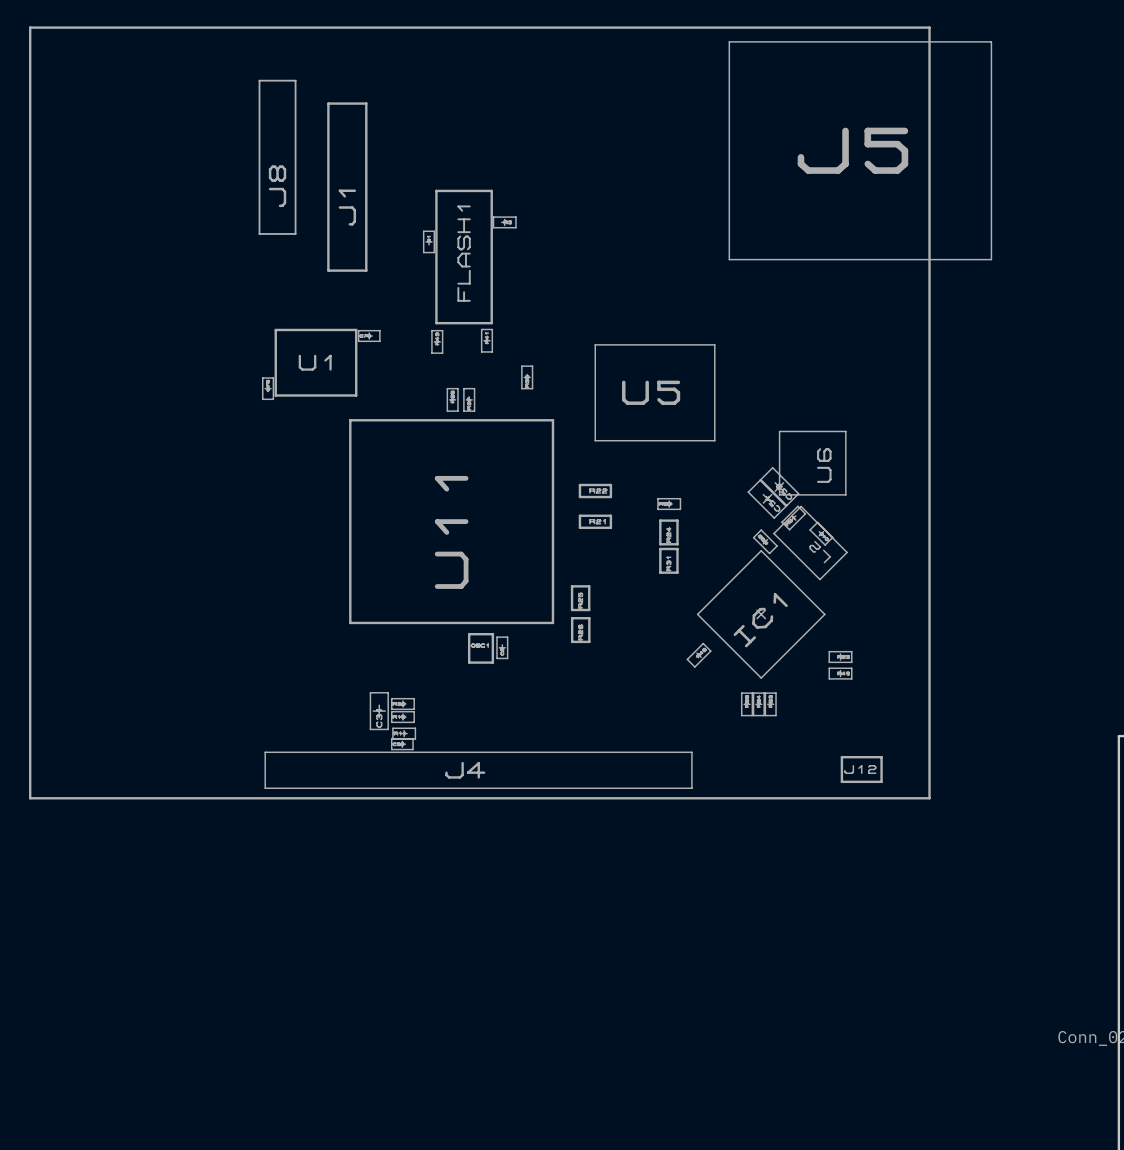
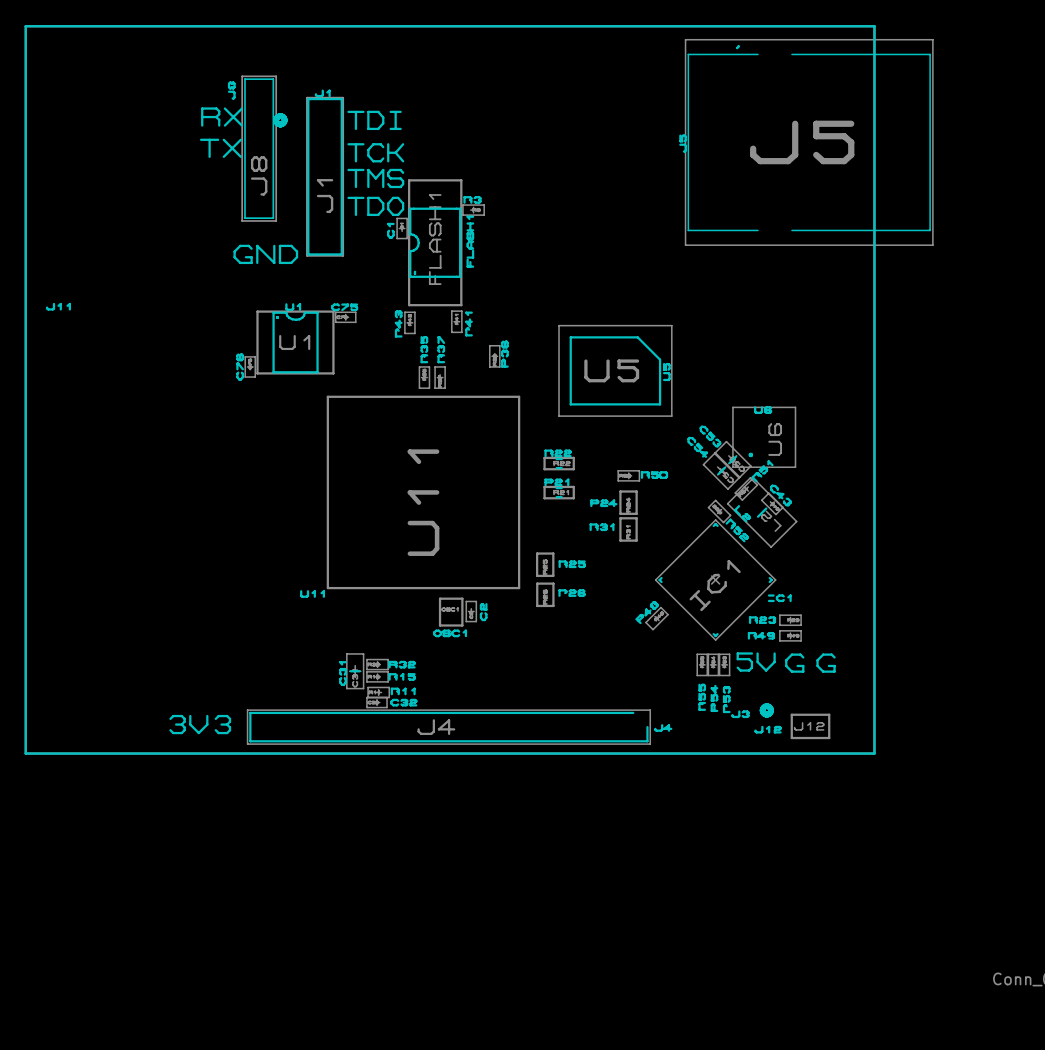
line: none -> (25, 26) (25, 753) (874, 753) (874, 26) (25, 26)
line: none -> (738, 46) (738, 46)
line: none -> (737, 47) (737, 48)
line: none -> (758, 54) (688, 54) (688, 230) (758, 230)
line: none -> (791, 54) (930, 54) (930, 230) (791, 230)
line: none -> (244, 79) (244, 218) (273, 218) (273, 79) (244, 79)
line: none -> (229, 82) (229, 87) (233, 88) (234, 83) (229, 82)
line: none -> (322, 90) (321, 96) (315, 94)
line: none -> (229, 91) (234, 92) (232, 98)
line: none -> (327, 92) (329, 90) (329, 96)
line: none -> (308, 99) (308, 254) (341, 254) (341, 99) (308, 99)
line: none -> (224, 108) (241, 125)
line: none -> (241, 108) (224, 125)
line: none -> (348, 111) (363, 111)
line: none -> (355, 111) (355, 128)
line: none -> (368, 111) (378, 111) (383, 117) (383, 123) (378, 128) (368, 128) (368, 111)
line: none -> (390, 111) (400, 111)
line: none -> (395, 111) (395, 128)
line: none -> (280, 116) (276, 120) (280, 124) (284, 120) (280, 116)
line: none -> (202, 117) (216, 117)
line: none -> (216, 117) (219, 119) (219, 125)
line: none -> (216, 117) (219, 114) (216, 108) (202, 108) (202, 125)
line: none -> (390, 128) (400, 128)
line: none -> (680, 135) (680, 141) (682, 141) (683, 135) (685, 136) (684, 141)
line: none -> (201, 139) (218, 139)
line: none -> (209, 139) (209, 156)
line: none -> (223, 139) (240, 156)
line: none -> (240, 139) (223, 156)
line: none -> (348, 144) (363, 144)
line: none -> (355, 144) (355, 161)
line: none -> (388, 144) (388, 161)
line: none -> (403, 144) (395, 152)
line: none -> (680, 144) (685, 145) (683, 151)
line: none -> (383, 147) (380, 144) (373, 144) (368, 149) (368, 155) (373, 161) (380, 161) (383, 158)
line: none -> (388, 152) (395, 152)
line: none -> (395, 152) (403, 161)
line: none -> (348, 169) (363, 169)
line: none -> (355, 169) (355, 186)
line: none -> (403, 172) (400, 169) (390, 169) (388, 175) (390, 178) (400, 178) (403, 184) (400, 186) (390, 186) (388, 184)
line: none -> (368, 186) (368, 169) (375, 178) (383, 169) (383, 186)
line: none -> (348, 197) (363, 197)
line: none -> (355, 197) (355, 214)
line: none -> (368, 197) (378, 197) (383, 203) (383, 209) (378, 214) (368, 214) (368, 197)
line: none -> (393, 197) (398, 197) (403, 203) (403, 209) (398, 214) (393, 214) (388, 209) (388, 203) (393, 197)
line: none -> (474, 198) (480, 198) (479, 202) (474, 201)
line: none -> (464, 202) (464, 197) (471, 198) (471, 202)
line: none -> (410, 208) (460, 208) (460, 276) (410, 276) (410, 251) (416, 248) (418, 242) (416, 236) (410, 234) (410, 208)
line: none -> (473, 216) (467, 216) (469, 218)
line: none -> (467, 223) (473, 223)
line: none -> (470, 223) (470, 230)
line: none -> (393, 223) (388, 223) (389, 226)
line: none -> (467, 230) (473, 230)
line: none -> (389, 230) (389, 237) (393, 235) (392, 230)
line: none -> (468, 232) (467, 238) (469, 239) (472, 232) (472, 239)
line: none -> (471, 241) (471, 248)
line: none -> (473, 241) (467, 243) (469, 248) (473, 248)
line: none -> (274, 245) (274, 262) (257, 245) (257, 262)
line: none -> (279, 245) (291, 245) (297, 251) (297, 257) (291, 262) (279, 262) (279, 245)
line: none -> (251, 248) (248, 245) (240, 245) (234, 251) (234, 257) (240, 262) (251, 262) (251, 257) (245, 257)
line: none -> (473, 250) (473, 257) (467, 257)
line: none -> (467, 259) (467, 266) (473, 266)
line: none -> (470, 262) (470, 266)
line: none -> (415, 271) (414, 272)
line: none -> (414, 273) (415, 273)
line: none -> (53, 303) (52, 309) (47, 307)
line: none -> (286, 304) (287, 309) (293, 308) (293, 304)
line: none -> (342, 304) (347, 304) (342, 310)
line: none -> (357, 304) (351, 304) (351, 306) (357, 307) (355, 310) (351, 309)
line: none -> (58, 305) (60, 303) (60, 309)
line: none -> (67, 305) (69, 303) (69, 309)
line: none -> (338, 305) (332, 306) (334, 310) (338, 309)
line: none -> (297, 306) (300, 304) (300, 309)
line: none -> (273, 312) (273, 372) (317, 372) (317, 312) (304, 312) (302, 317) (296, 319) (289, 317) (286, 312) (273, 312)
line: none -> (398, 312) (395, 312) (396, 317)
line: none -> (398, 312) (401, 312) (400, 317)
line: none -> (398, 312) (398, 314)
line: none -> (471, 312) (466, 312) (468, 314)
line: none -> (469, 319) (469, 326) (466, 321) (471, 321)
line: none -> (399, 320) (399, 327) (395, 322) (401, 322)
line: none -> (469, 329) (466, 329) (466, 335) (471, 335)
line: none -> (398, 330) (395, 330) (395, 336) (401, 336)
line: none -> (421, 337) (421, 342) (426, 337) (426, 342)
line: none -> (570, 337) (637, 337) (660, 359) (660, 404) (570, 404) (570, 337)
line: none -> (503, 341) (503, 347) (506, 347) (507, 342) (504, 342) (504, 347)
line: none -> (438, 342) (438, 337) (443, 342)
line: none -> (422, 351) (422, 346) (427, 347) (426, 351)
line: none -> (439, 351) (439, 346) (443, 347) (443, 351)
line: none -> (238, 354) (238, 360) (241, 360) (242, 355) (240, 355) (240, 360)
line: none -> (427, 355) (421, 356) (421, 362) (427, 362)
line: none -> (443, 355) (438, 356) (438, 362) (443, 362)
line: none -> (503, 356) (503, 350) (507, 351) (506, 356)
line: none -> (664, 364) (664, 369) (665, 369) (666, 364) (669, 365) (668, 369)
line: none -> (504, 366) (504, 360) (503, 359) (502, 366) (507, 366)
line: none -> (237, 369) (237, 363) (242, 369)
line: none -> (238, 372) (239, 379) (242, 377) (241, 372)
line: none -> (664, 373) (669, 374) (668, 379) (664, 379)
line: none -> (755, 407) (756, 412) (761, 411) (761, 407)
line: none -> (771, 408) (765, 408) (765, 411) (769, 412) (769, 410) (765, 410)
line: none -> (707, 430) (701, 426) (700, 430) (704, 433)
line: none -> (707, 435) (711, 439) (712, 437) (709, 433) (710, 432) (714, 436)
line: none -> (716, 439) (720, 442) (718, 445) (716, 446) (713, 442)
line: none -> (695, 442) (689, 437) (688, 442) (692, 444)
line: none -> (694, 447) (698, 451) (698, 443) (702, 447)
line: none -> (555, 451) (560, 450) (561, 452) (556, 453) (555, 456) (561, 456)
line: none -> (564, 451) (570, 451) (564, 454) (564, 456) (570, 456)
line: none -> (750, 453) (749, 454) (750, 456) (751, 454) (750, 453)
line: none -> (545, 456) (545, 450) (552, 451) (552, 456)
line: none -> (703, 456) (706, 452) (701, 452) (706, 456)
line: none -> (735, 456) (729, 462)
line: none -> (556, 459) (561, 459)
line: none -> (768, 464) (768, 461) (772, 465)
line: none -> (763, 466) (759, 470) (761, 471) (765, 468) (766, 470) (763, 473)
line: none -> (556, 468) (561, 468)
line: none -> (724, 467) (718, 474)
line: none -> (657, 472) (652, 472) (652, 474) (657, 475) (656, 477) (652, 476)
line: none -> (661, 472) (665, 472) (666, 476) (660, 476) (661, 472)
line: none -> (761, 476) (756, 473) (752, 477) (756, 481)
line: none -> (641, 477) (641, 472) (647, 472) (648, 477)
line: none -> (555, 480) (560, 479) (561, 481) (556, 482) (555, 485) (561, 485)
line: none -> (565, 481) (568, 479) (568, 485)
line: none -> (545, 482) (551, 482) (552, 480) (545, 479) (545, 485)
line: none -> (556, 488) (561, 488)
line: none -> (777, 489) (772, 485) (771, 489) (775, 492)
line: none -> (556, 497) (561, 497)
line: none -> (779, 497) (783, 494) (777, 493) (782, 498)
line: none -> (786, 498) (790, 501) (788, 504) (786, 505) (784, 501)
line: none -> (601, 501) (606, 500) (607, 502) (602, 503) (601, 505) (607, 505)
line: none -> (591, 503) (597, 503) (598, 501) (591, 500) (591, 505)
line: none -> (616, 504) (609, 504) (614, 500) (614, 505)
line: none -> (738, 506) (735, 510) (739, 514)
line: none -> (766, 508) (758, 516)
line: none -> (745, 514) (749, 518) (742, 517) (746, 521)
line: none -> (726, 523) (730, 519) (734, 523) (731, 528)
line: none -> (600, 525) (605, 524) (605, 527)
line: none -> (611, 526) (613, 524) (613, 529)
line: none -> (713, 525) (715, 523) (717, 525)
line: none -> (603, 527) (605, 527)
line: none -> (605, 527) (605, 529) (600, 529)
line: none -> (590, 529) (590, 524) (596, 524) (597, 529)
line: none -> (734, 530) (737, 533) (739, 532) (736, 528) (737, 526) (741, 530)
line: none -> (743, 533) (747, 537) (740, 537) (744, 541)
line: none -> (584, 561) (578, 561) (578, 563) (584, 564) (583, 566) (578, 566)
line: none -> (569, 562) (575, 562) (569, 565) (569, 566) (575, 566)
line: none -> (559, 566) (559, 561) (565, 561) (566, 566)
line: none -> (661, 578) (659, 580) (661, 582)
line: none -> (769, 578) (771, 580) (769, 582)
line: none -> (301, 591) (302, 596) (307, 595) (307, 591)
line: none -> (569, 591) (574, 590) (575, 592) (570, 593) (569, 595) (575, 595)
line: none -> (584, 591) (578, 591) (578, 594) (583, 595) (583, 593) (578, 593)
line: none -> (312, 593) (314, 591) (314, 596)
line: none -> (321, 593) (323, 591) (323, 596)
line: none -> (565, 593) (565, 590) (559, 590) (559, 595)
line: none -> (769, 595) (773, 595)
line: none -> (783, 596) (776, 597) (779, 600) (783, 600)
line: none -> (788, 597) (790, 595) (790, 600)
line: none -> (769, 600) (773, 600)
line: none -> (654, 602) (651, 604) (653, 608) (657, 606) (654, 602)
line: none -> (486, 604) (486, 609) (483, 608) (482, 604) (480, 605) (481, 609)
line: none -> (650, 610) (645, 615) (646, 609) (650, 613)
line: none -> (481, 613) (482, 620) (486, 617) (485, 613)
line: none -> (760, 618) (764, 617) (765, 619) (761, 620) (760, 622) (765, 622)
line: none -> (769, 618) (775, 618) (773, 622) (769, 621)
line: none -> (638, 621) (642, 617) (642, 614) (636, 619) (640, 622)
line: none -> (750, 622) (750, 617) (755, 617) (756, 622)
line: none -> (436, 630) (434, 634) (438, 636) (440, 632) (436, 630)
line: none -> (450, 631) (443, 631) (448, 633) (448, 636) (443, 635)
line: none -> (459, 631) (452, 632) (454, 636) (459, 635)
line: none -> (463, 632) (465, 630) (465, 636)
line: none -> (713, 634) (715, 636) (717, 634)
line: none -> (773, 634) (772, 635) (769, 635) (768, 633) (773, 633) (773, 637) (769, 638)
line: none -> (764, 636) (758, 636) (762, 633) (762, 638)
line: none -> (748, 638) (748, 633) (755, 633) (755, 638)
line: none -> (751, 653) (737, 653) (737, 659) (749, 659) (751, 662) (751, 667) (749, 670) (740, 670) (737, 667)
line: none -> (757, 653) (757, 662) (766, 670) (774, 662) (774, 653)
line: none -> (803, 657) (800, 654) (791, 654) (786, 660) (786, 665) (791, 671) (803, 671) (803, 665) (797, 665)
line: none -> (834, 657) (831, 654) (823, 654) (817, 660) (817, 665) (823, 671) (834, 671) (834, 665) (828, 665)
line: none -> (345, 662) (340, 662) (342, 664)
line: none -> (399, 662) (405, 662) (404, 667) (399, 666)
line: none -> (408, 662) (413, 661) (414, 663) (410, 664) (408, 667) (414, 667)
line: none -> (389, 664) (395, 664)
line: none -> (395, 664) (396, 667)
line: none -> (395, 664) (395, 661) (389, 661) (389, 667)
line: none -> (350, 671) (359, 671)
line: none -> (341, 674) (341, 669) (345, 670) (344, 674)
line: none -> (414, 674) (408, 674) (408, 676) (414, 676) (413, 679) (408, 678)
line: none -> (400, 676) (403, 674) (403, 679)
line: none -> (341, 678) (342, 684) (345, 682) (344, 678)
line: none -> (389, 679) (389, 674) (395, 674) (396, 679)
line: none -> (699, 684) (699, 690) (701, 690) (702, 684) (704, 685) (703, 690)
line: none -> (715, 685) (715, 692) (711, 688) (717, 688)
line: none -> (403, 690) (405, 688) (405, 694)
line: none -> (412, 690) (414, 688) (414, 694)
line: none -> (724, 692) (724, 687) (729, 688) (728, 692)
line: none -> (391, 694) (391, 688) (398, 689) (398, 694)
line: none -> (699, 693) (699, 699) (701, 699) (702, 693) (704, 695) (703, 699)
line: none -> (711, 695) (711, 700) (713, 700) (714, 695) (717, 696) (716, 700)
line: none -> (724, 696) (724, 701) (725, 701) (726, 696) (729, 697) (728, 701)
line: none -> (398, 700) (391, 701) (393, 705) (398, 704)
line: none -> (401, 700) (406, 699) (406, 702)
line: none -> (410, 700) (416, 700) (410, 703) (410, 705) (416, 705)
line: none -> (403, 702) (406, 702)
line: none -> (406, 702) (406, 705) (401, 704)
line: none -> (704, 702) (699, 704) (699, 709) (704, 709)
line: none -> (726, 706) (724, 706) (724, 712) (729, 712)
line: none -> (766, 706) (762, 711) (767, 714) (770, 709) (766, 706)
line: none -> (714, 710) (714, 705) (712, 704) (711, 710) (717, 710)
line: none -> (739, 711) (738, 716) (732, 715)
line: none -> (742, 712) (748, 712) (747, 716) (742, 716)
line: none -> (633, 712) (250, 712) (250, 741) (647, 741) (647, 727)
line: none -> (190, 716) (190, 724) (198, 733) (207, 724) (207, 716)
line: none -> (170, 718) (173, 716) (181, 716) (184, 718) (181, 724)
line: none -> (215, 718) (218, 716) (227, 716) (230, 718) (227, 724)
line: none -> (176, 724) (181, 724)
line: none -> (181, 724) (184, 727) (181, 733) (173, 733) (170, 730)
line: none -> (221, 724) (227, 724)
line: none -> (227, 724) (230, 727) (227, 733) (218, 733) (215, 730)
line: none -> (662, 725) (661, 730) (655, 728)
line: none -> (762, 726) (761, 732) (755, 730)
line: none -> (774, 727) (779, 726) (780, 728) (775, 729) (774, 732) (780, 732)
line: none -> (671, 728) (664, 728) (668, 725) (668, 730)
line: none -> (766, 728) (769, 726) (769, 732)

